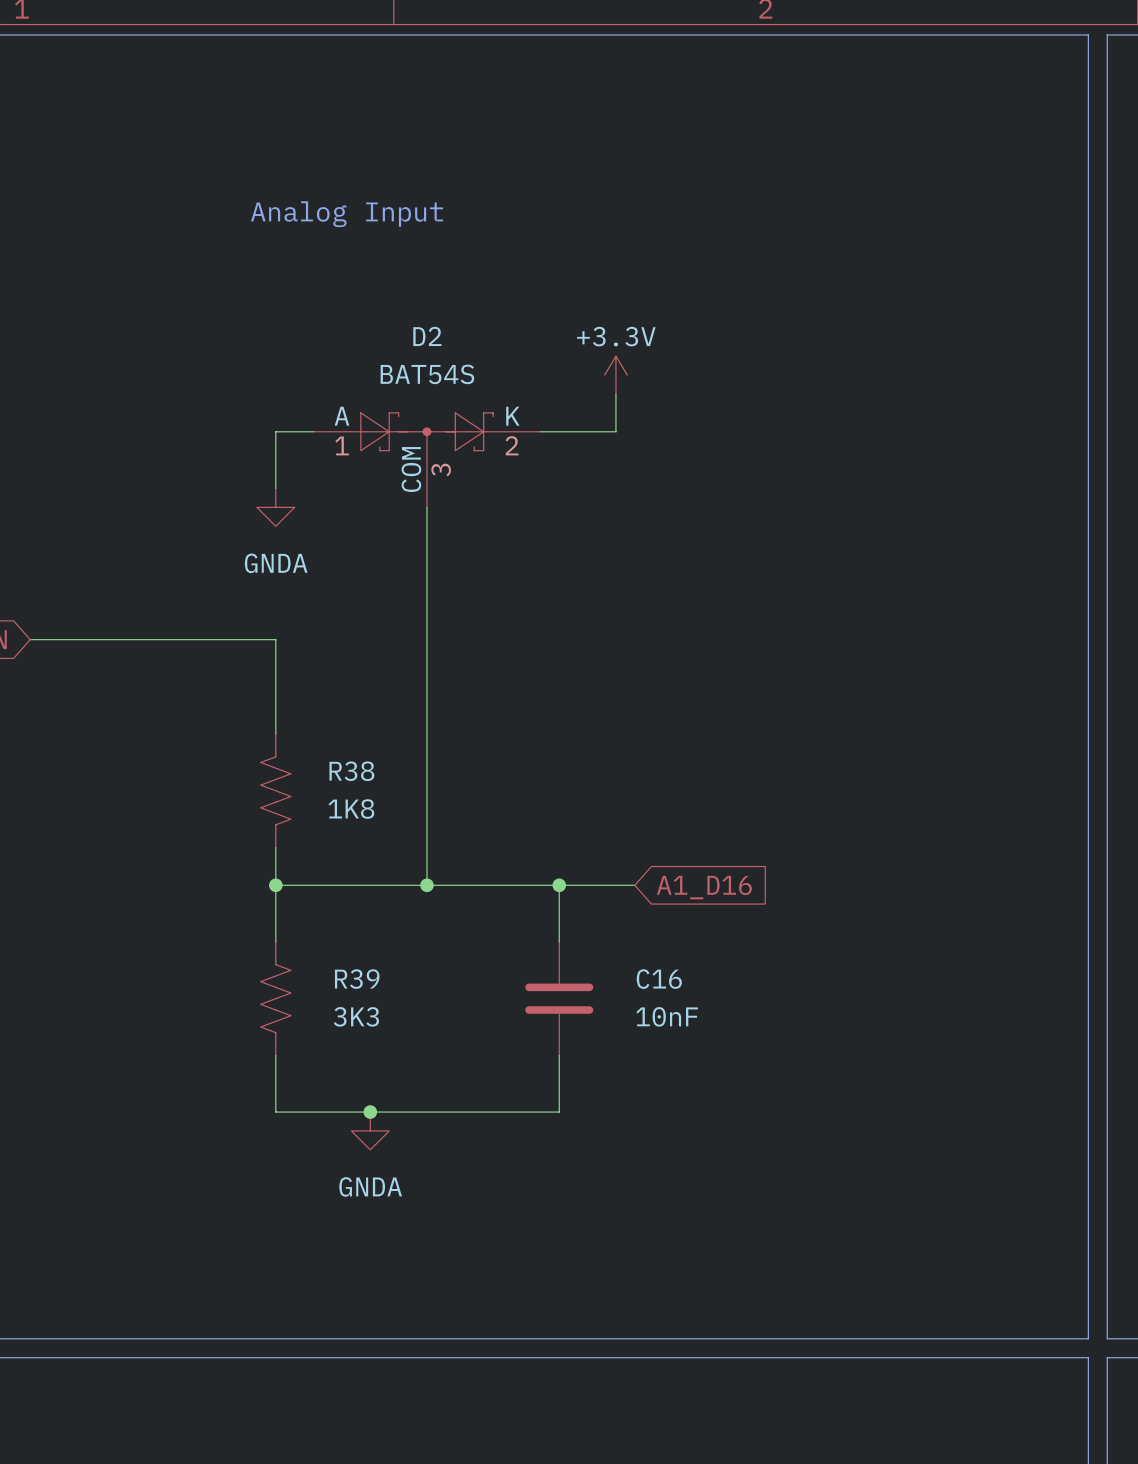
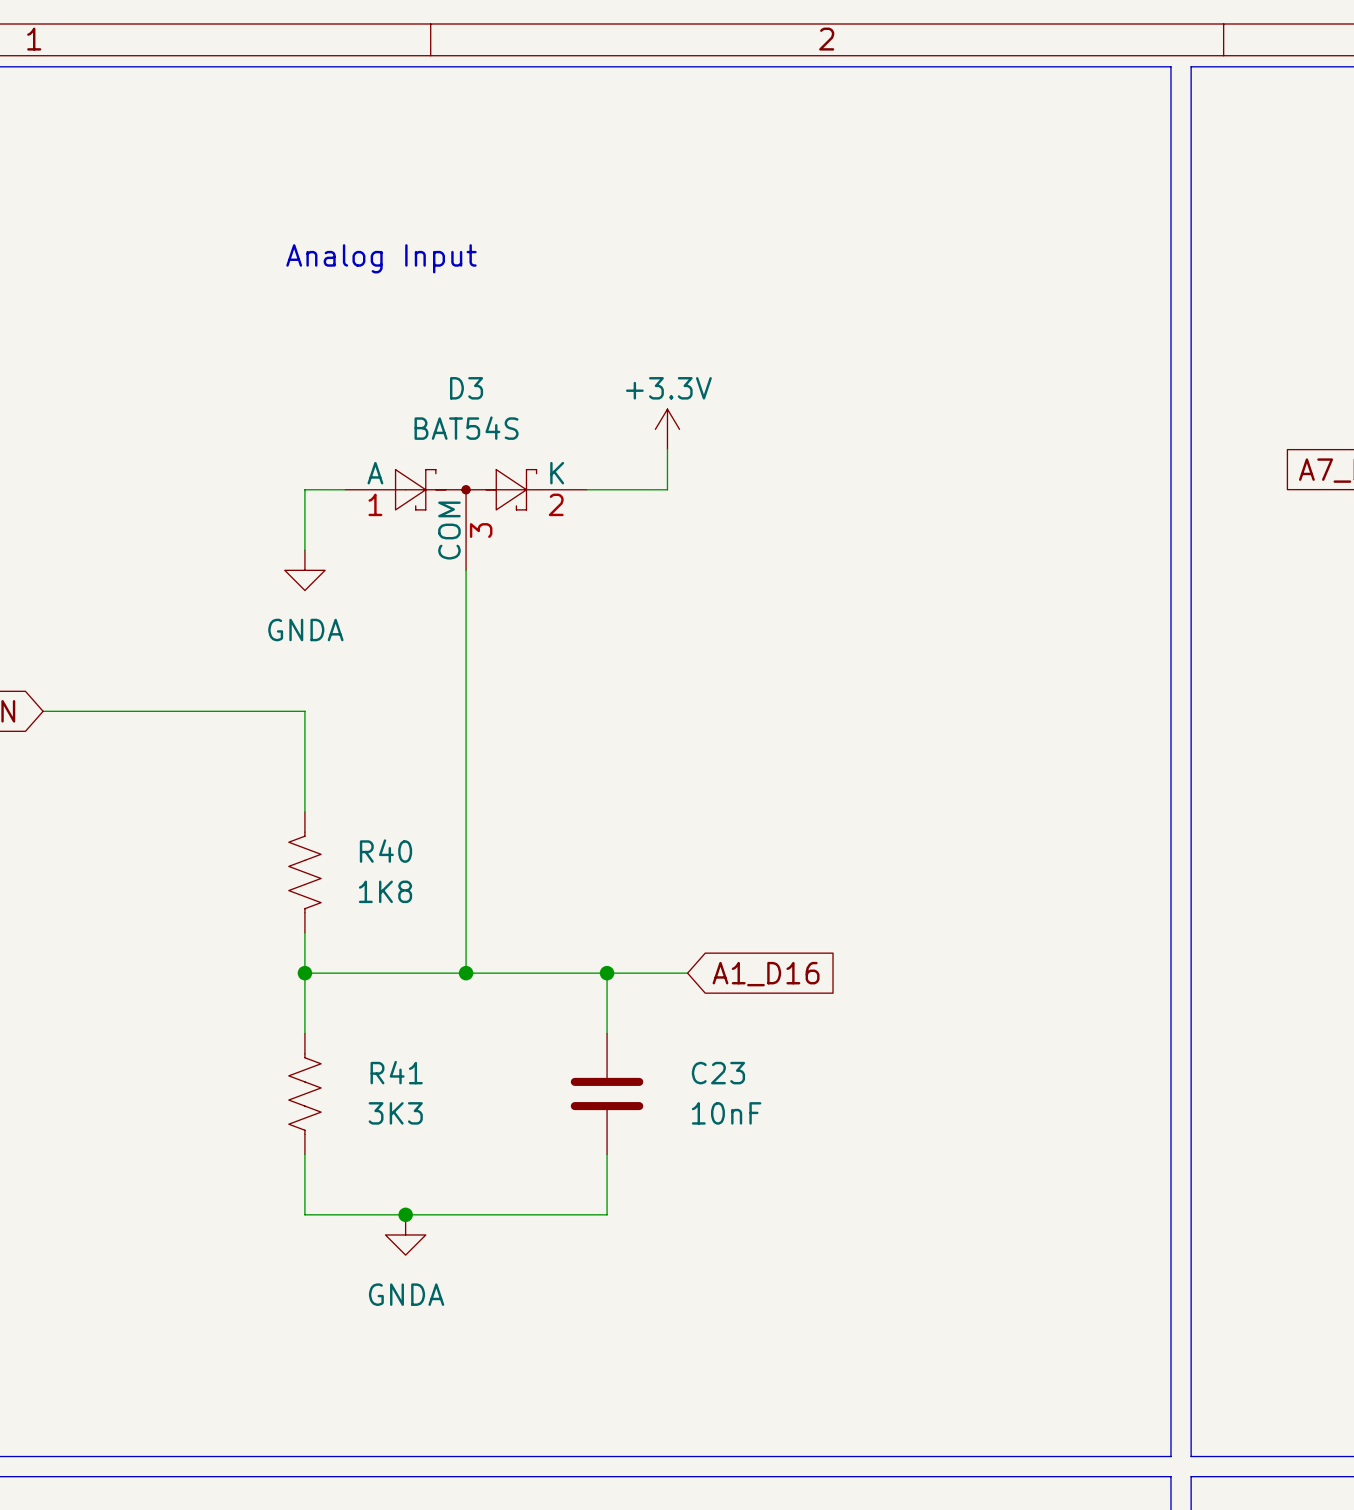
D2 name: D2 (427, 336) -> D3 (466, 388)
R38 name: R38 (351, 771) -> R40 (385, 851)
R39 name: R39 (357, 979) -> R41 (396, 1072)
C16 name: C16 (659, 979) -> C23 (718, 1073)

